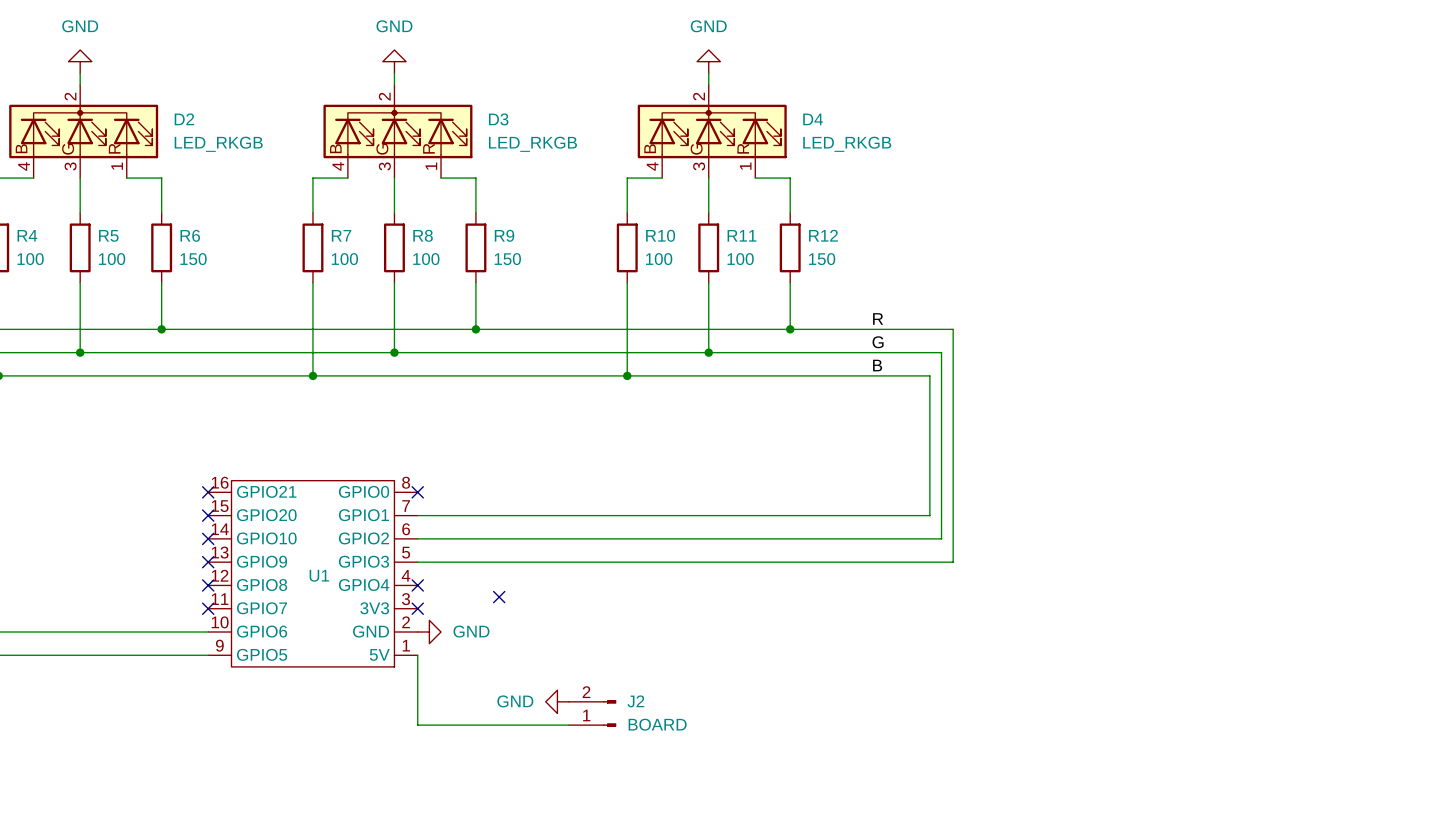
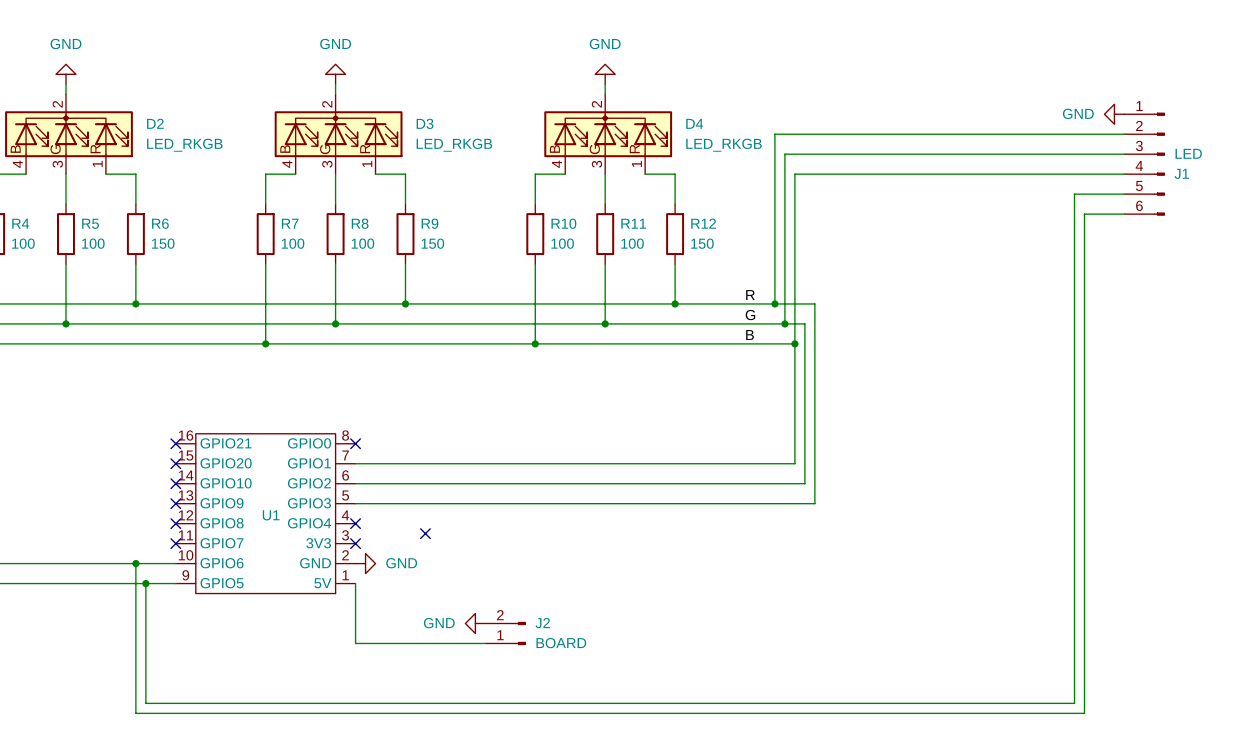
power symbol: none -> GND (1114, 114)
wire: none -> (1124, 134) (774, 134) (774, 303)
wire: none -> (1124, 154) (784, 154) (784, 323)
J1: none -> LED (1144, 164)
wire: none -> (1124, 174) (794, 174) (794, 343)
wire: none -> (1124, 194) (1074, 194) (1074, 703) (145, 703) (145, 583)
wire: none -> (1124, 214) (1084, 214) (1084, 713) (135, 713) (135, 563)
junction: none -> (774, 303)
junction: none -> (784, 323)
junction: none -> (794, 343)
junction: none -> (135, 563)
junction: none -> (145, 583)

